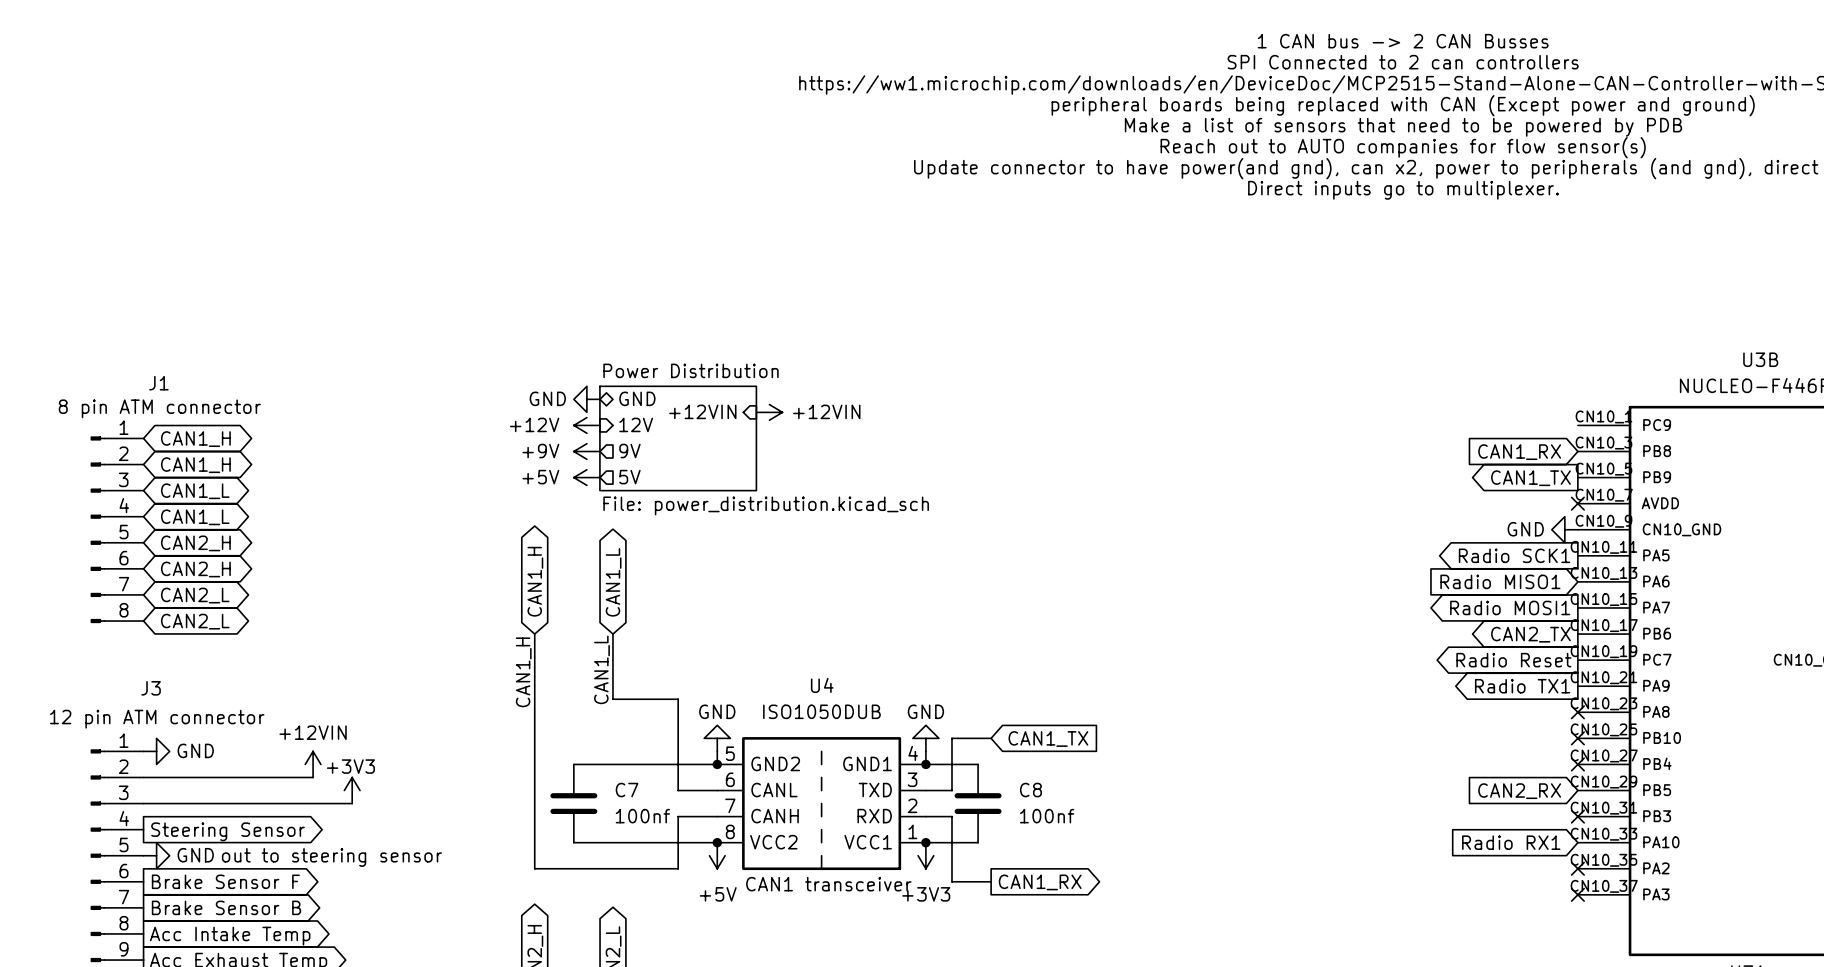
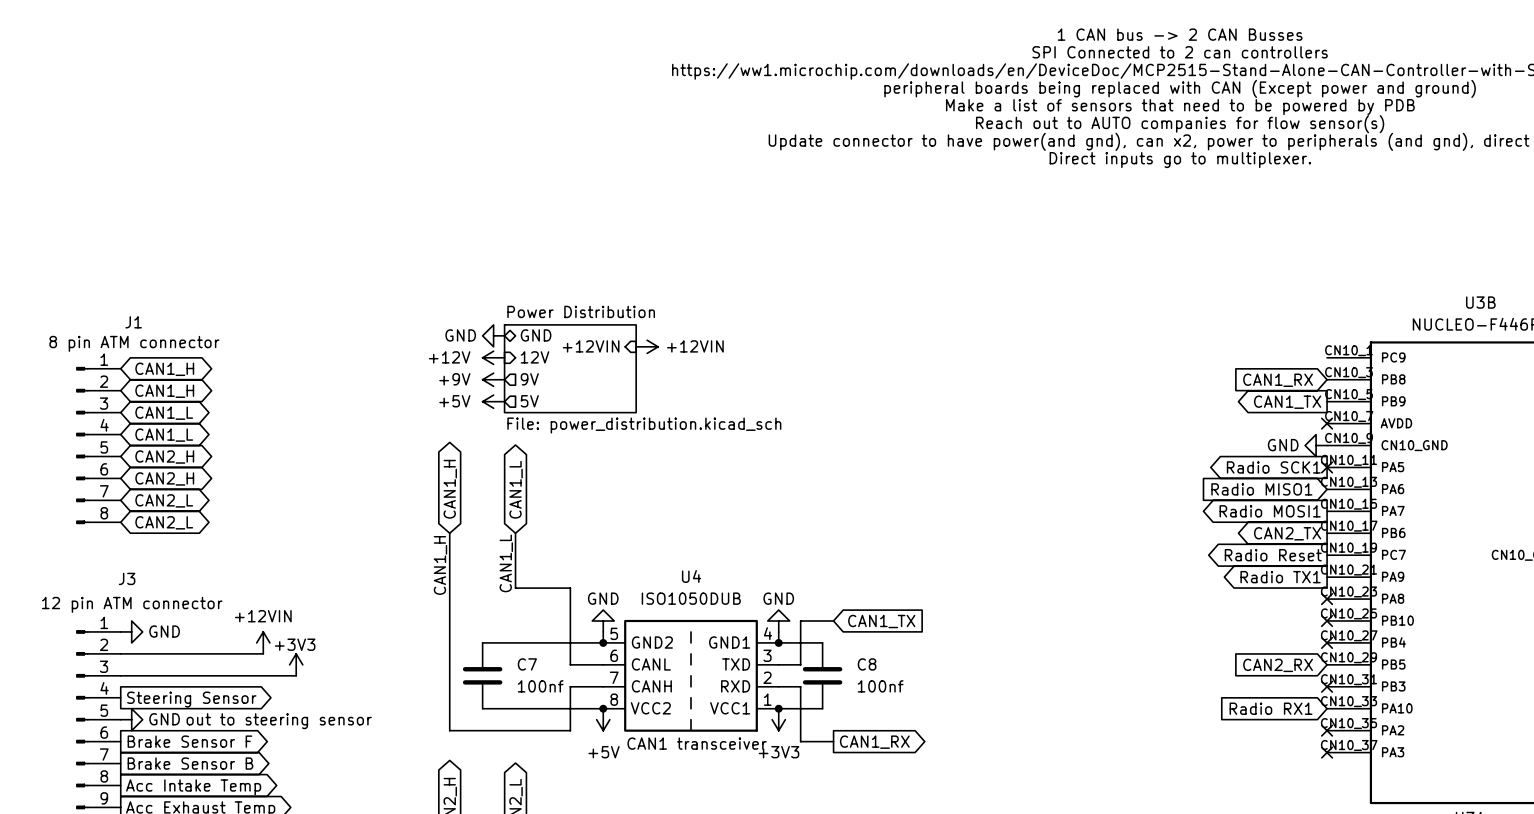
no-connect mark: none -> (1327, 467)

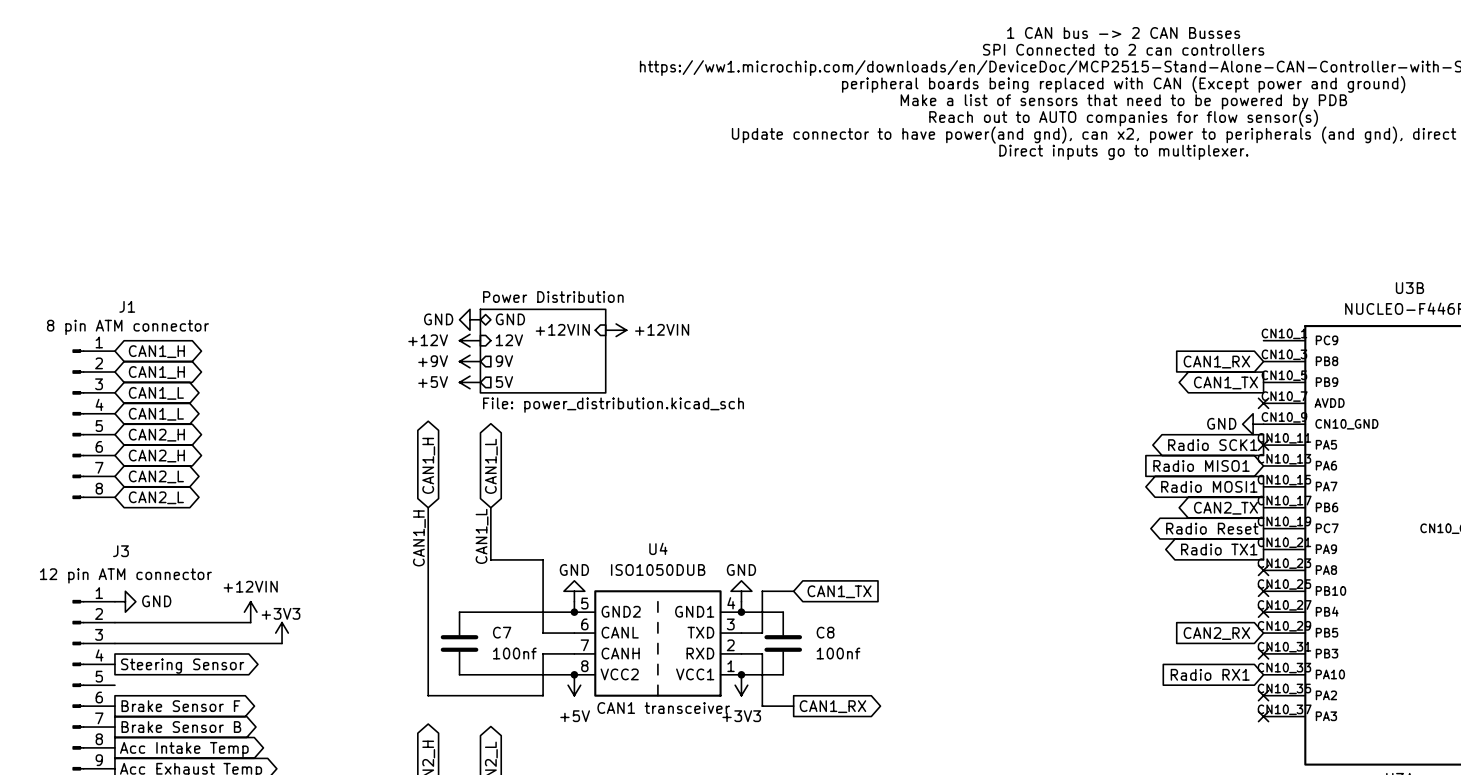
power symbol: GND (131, 719) -> none
text: out to steering sensor (279, 721) -> none

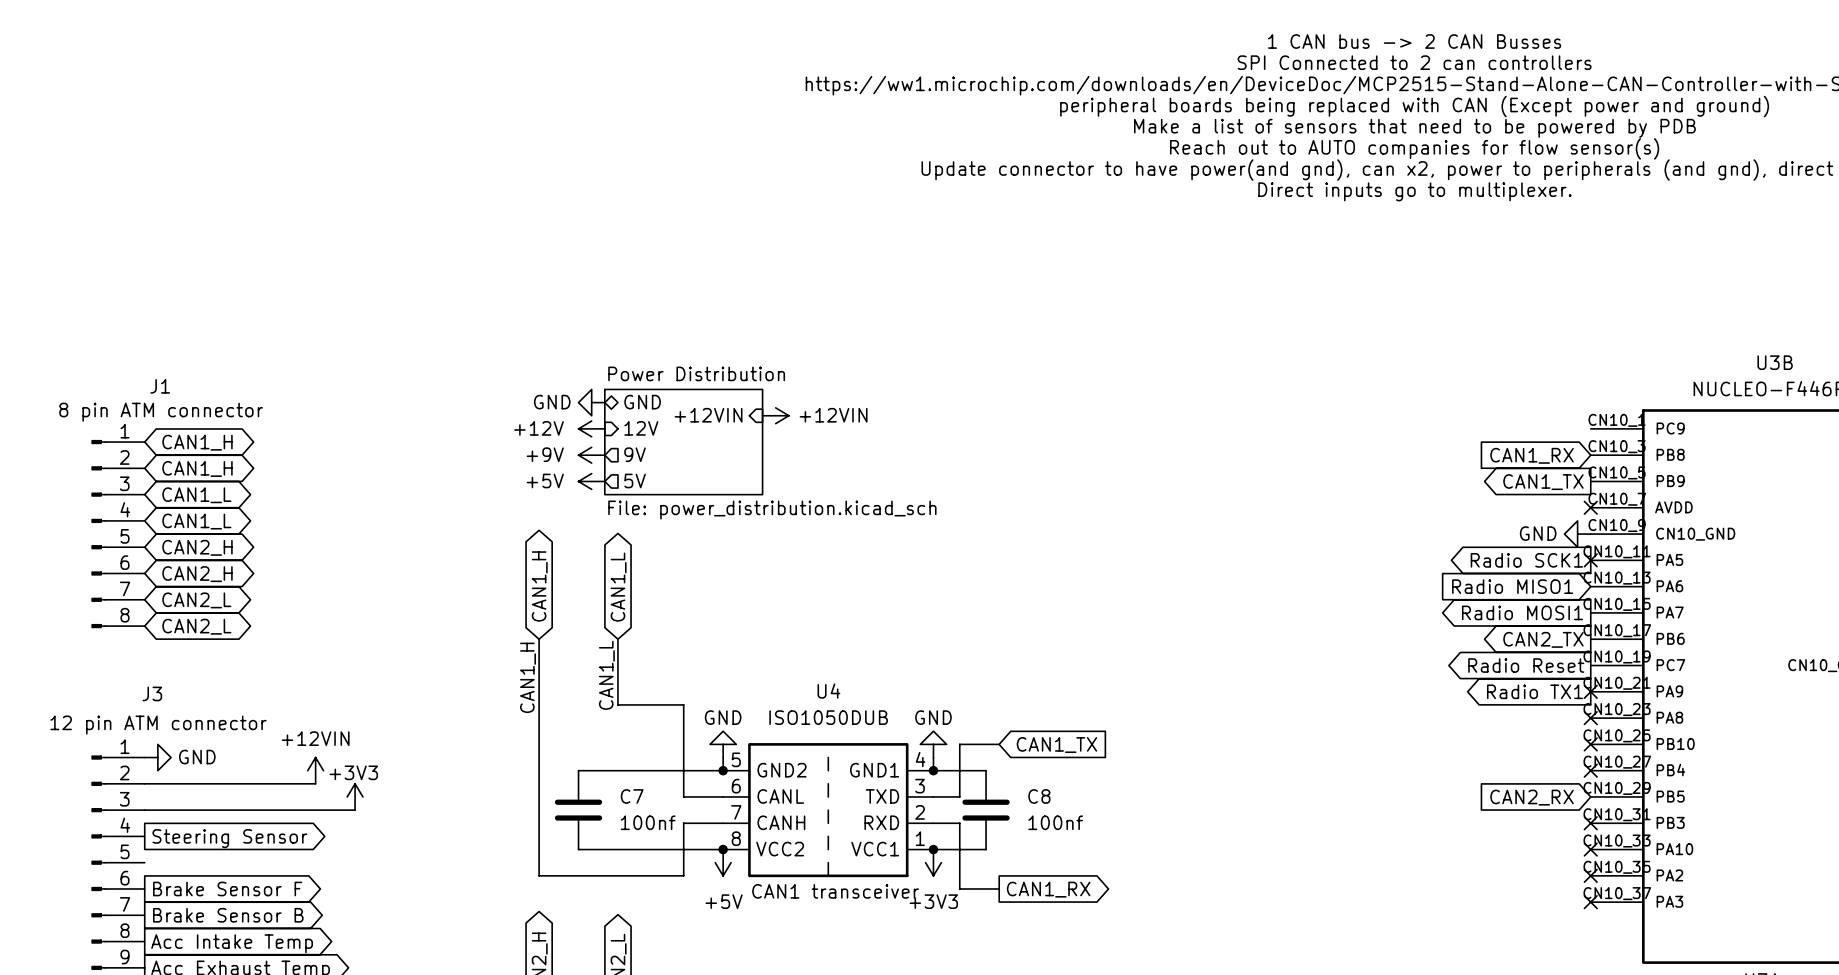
no-connect mark: none -> (1590, 691)
global label: Radio RX1 (1210, 674) -> none
no-connect mark: none -> (1590, 849)

